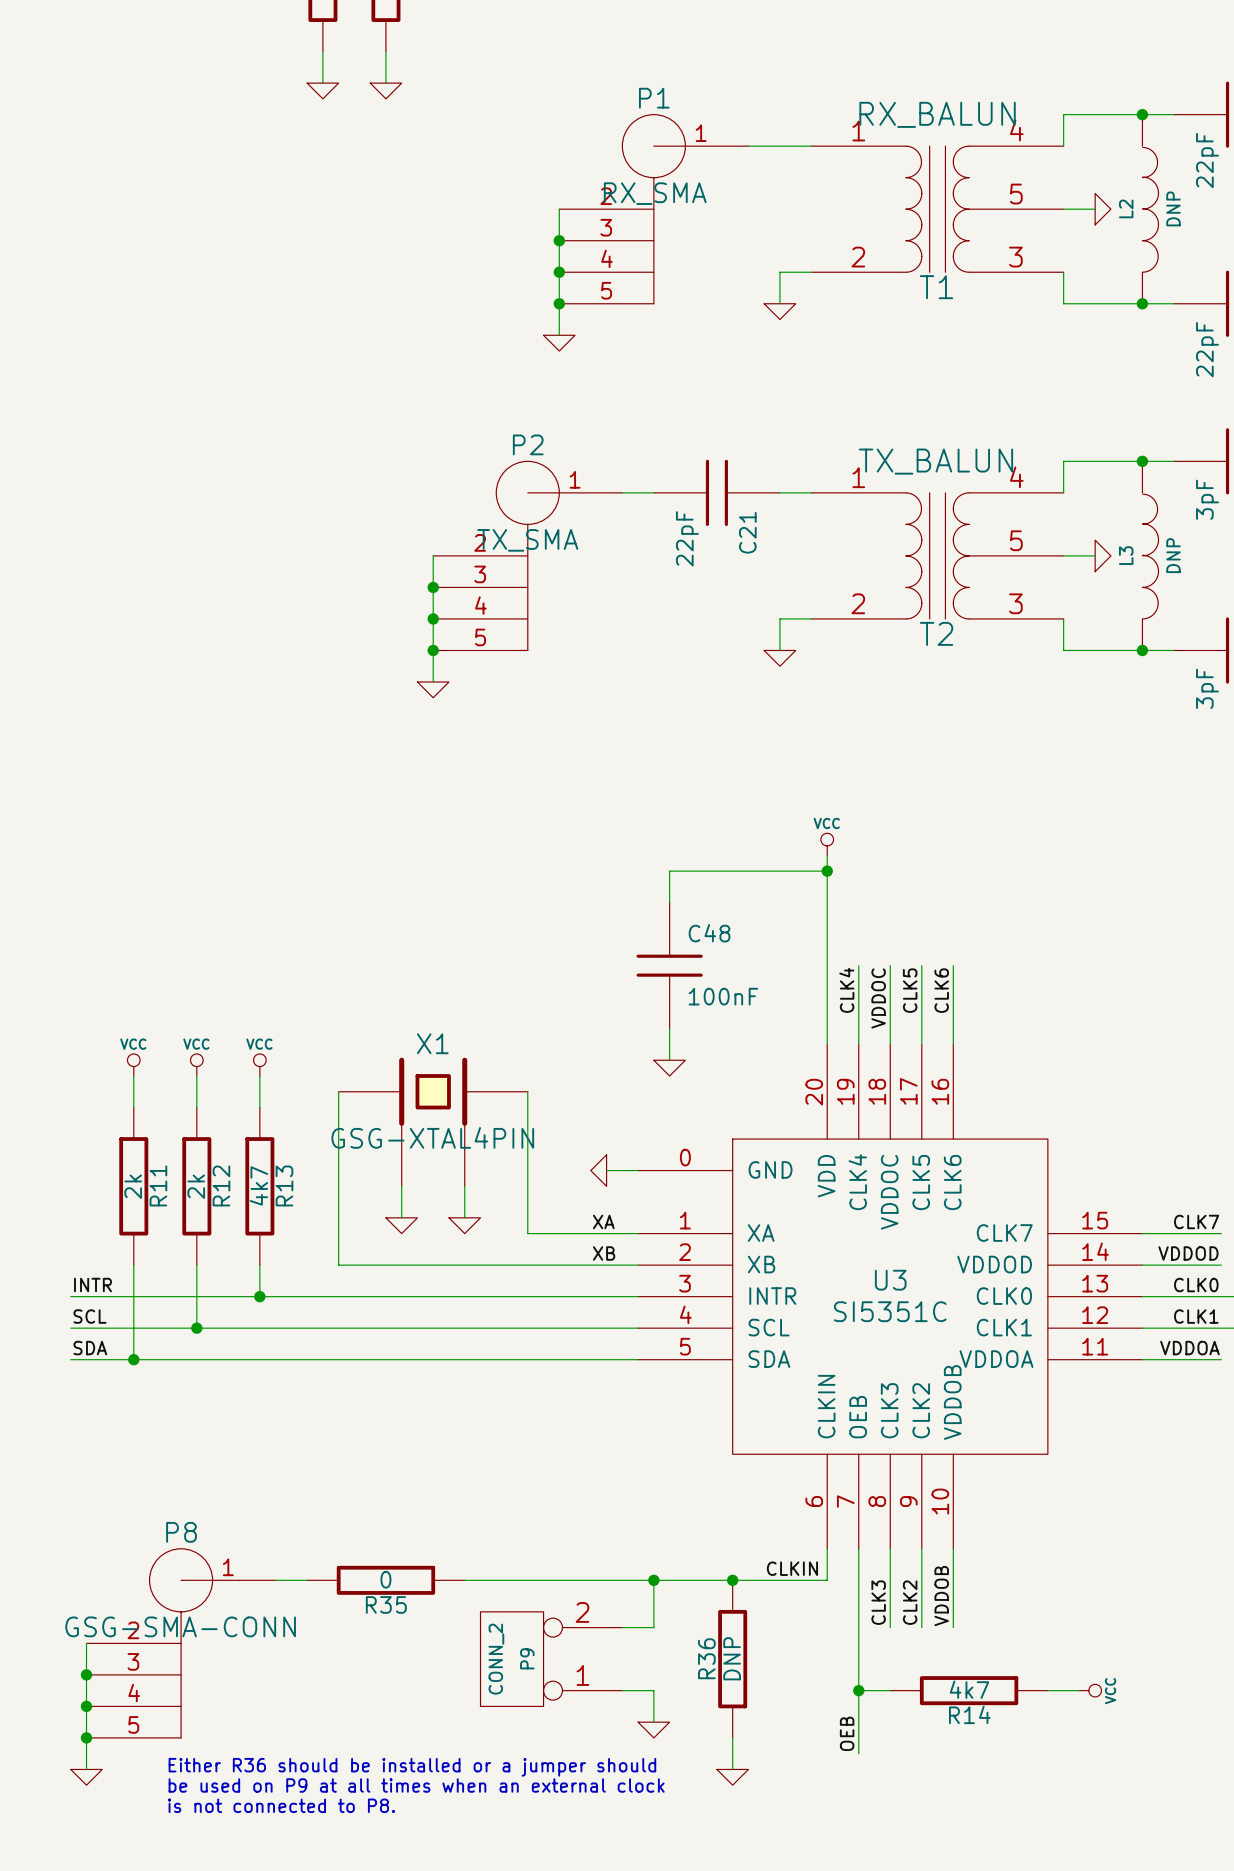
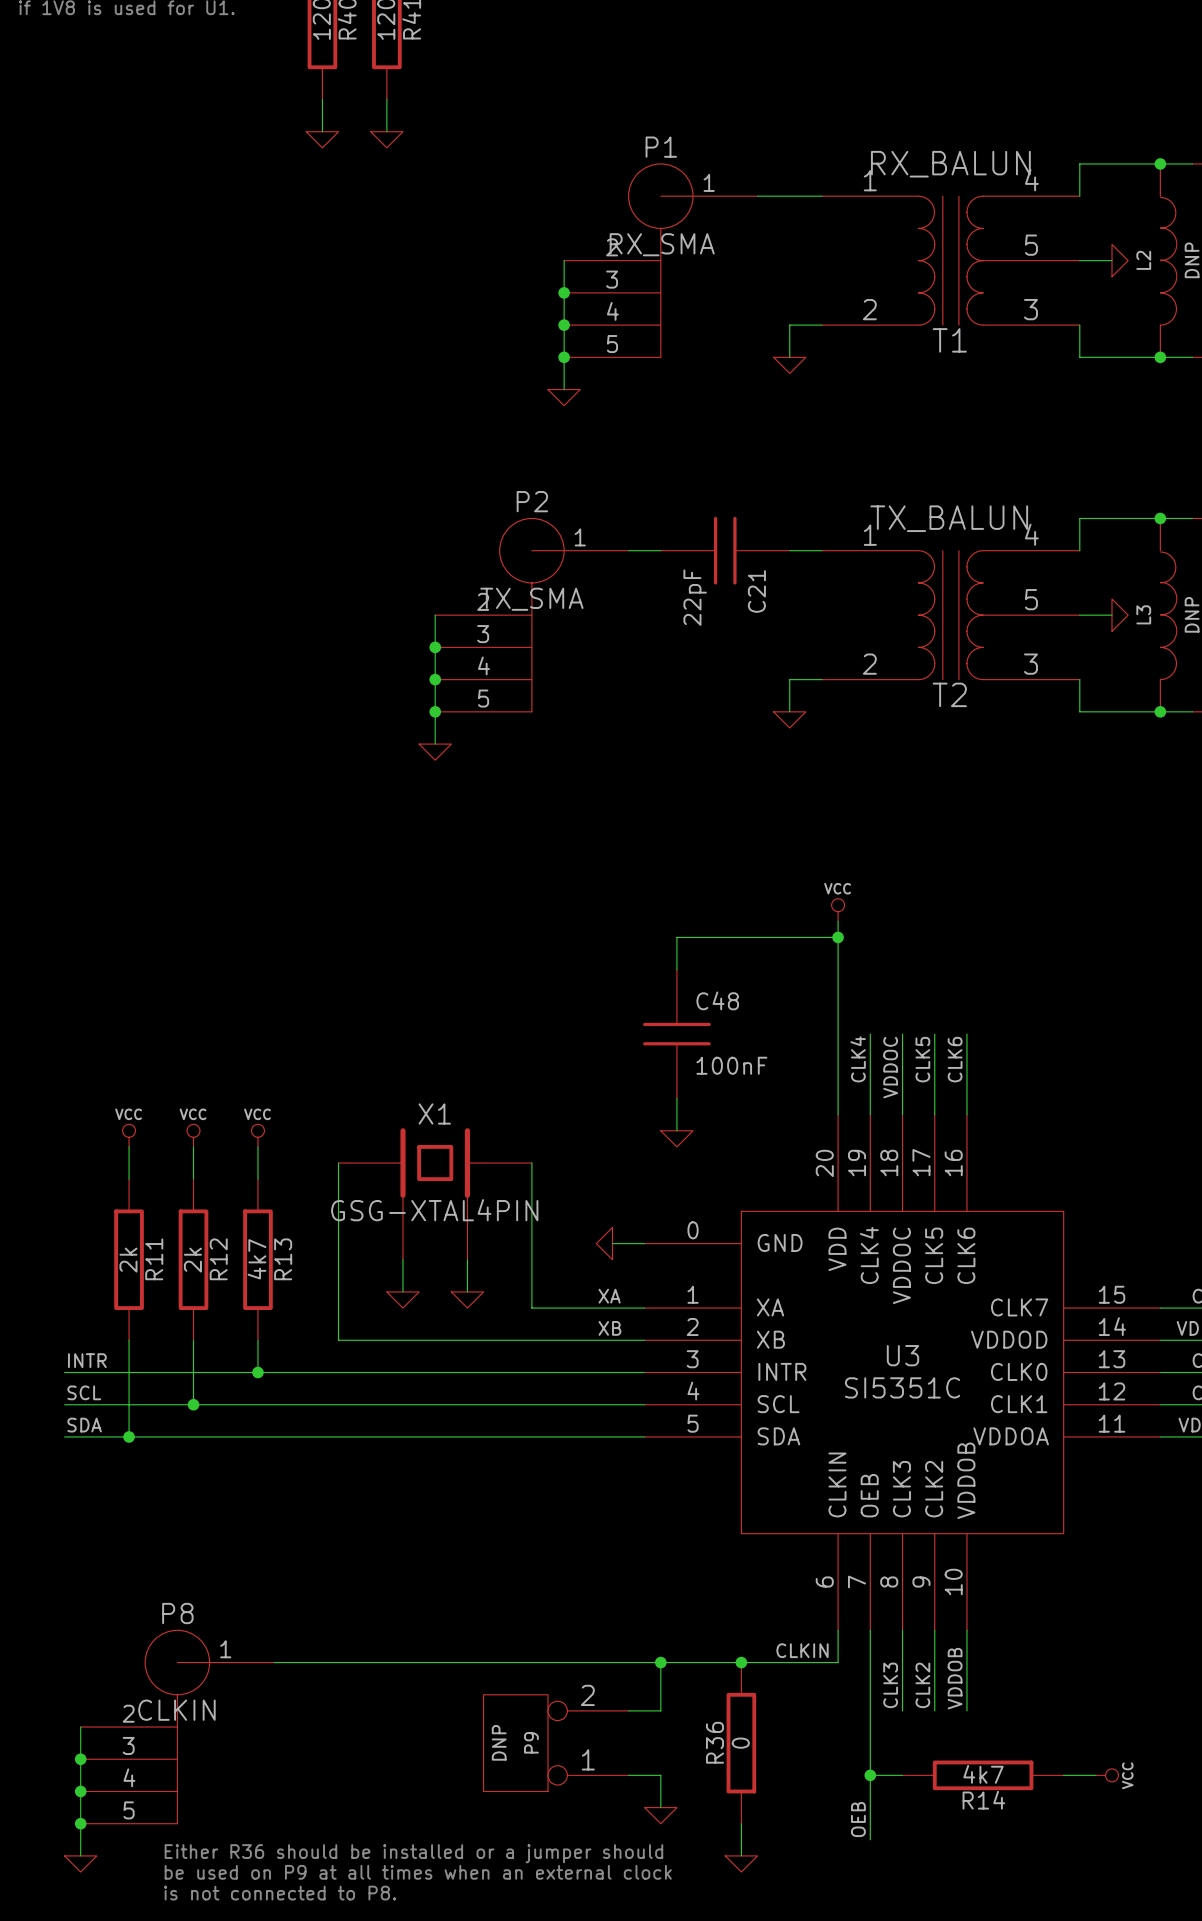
wire: none -> (306, 1662) (467, 1662)
R35: 0 (385, 1580) -> none
P8 value: GSG-SMA-CONN (180, 1626) -> CLKIN (176, 1710)
R36 value: DNP (732, 1658) -> 0 (740, 1743)
P9 value: CONN_2 (496, 1659) -> DNP (499, 1742)

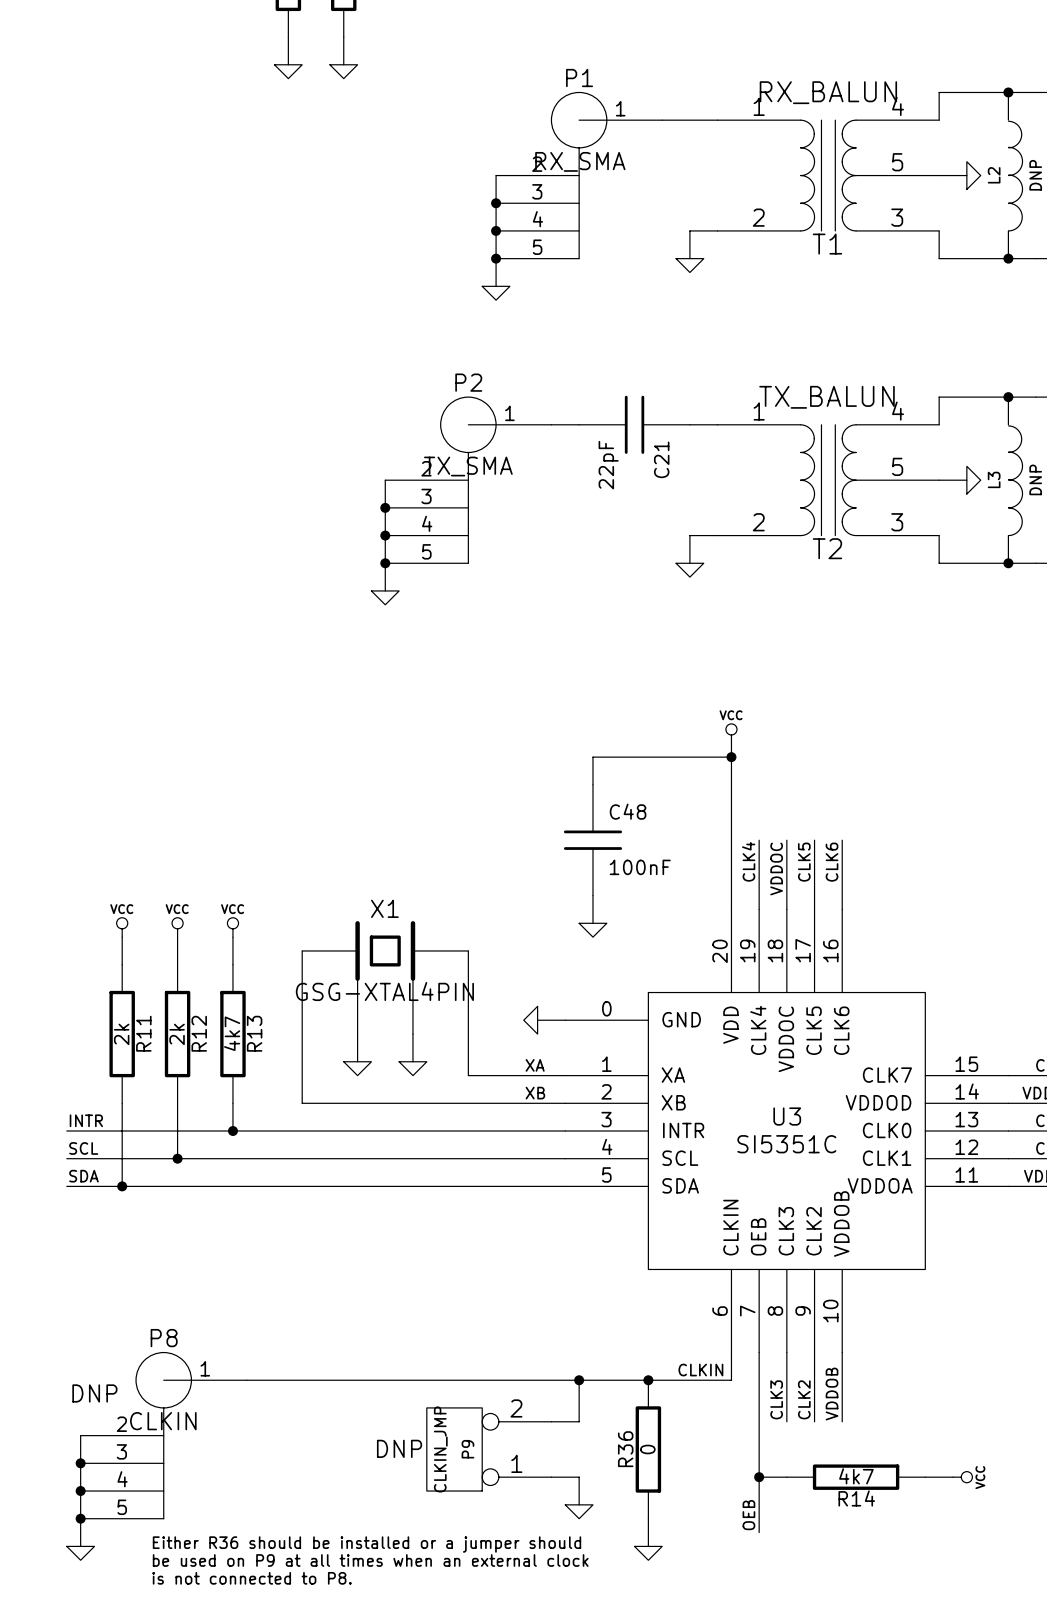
P8 text: none -> DNP (94, 1393)
P9 text: none -> DNP (399, 1448)
P9 value: DNP (499, 1742) -> CLKIN_JMP (440, 1449)

